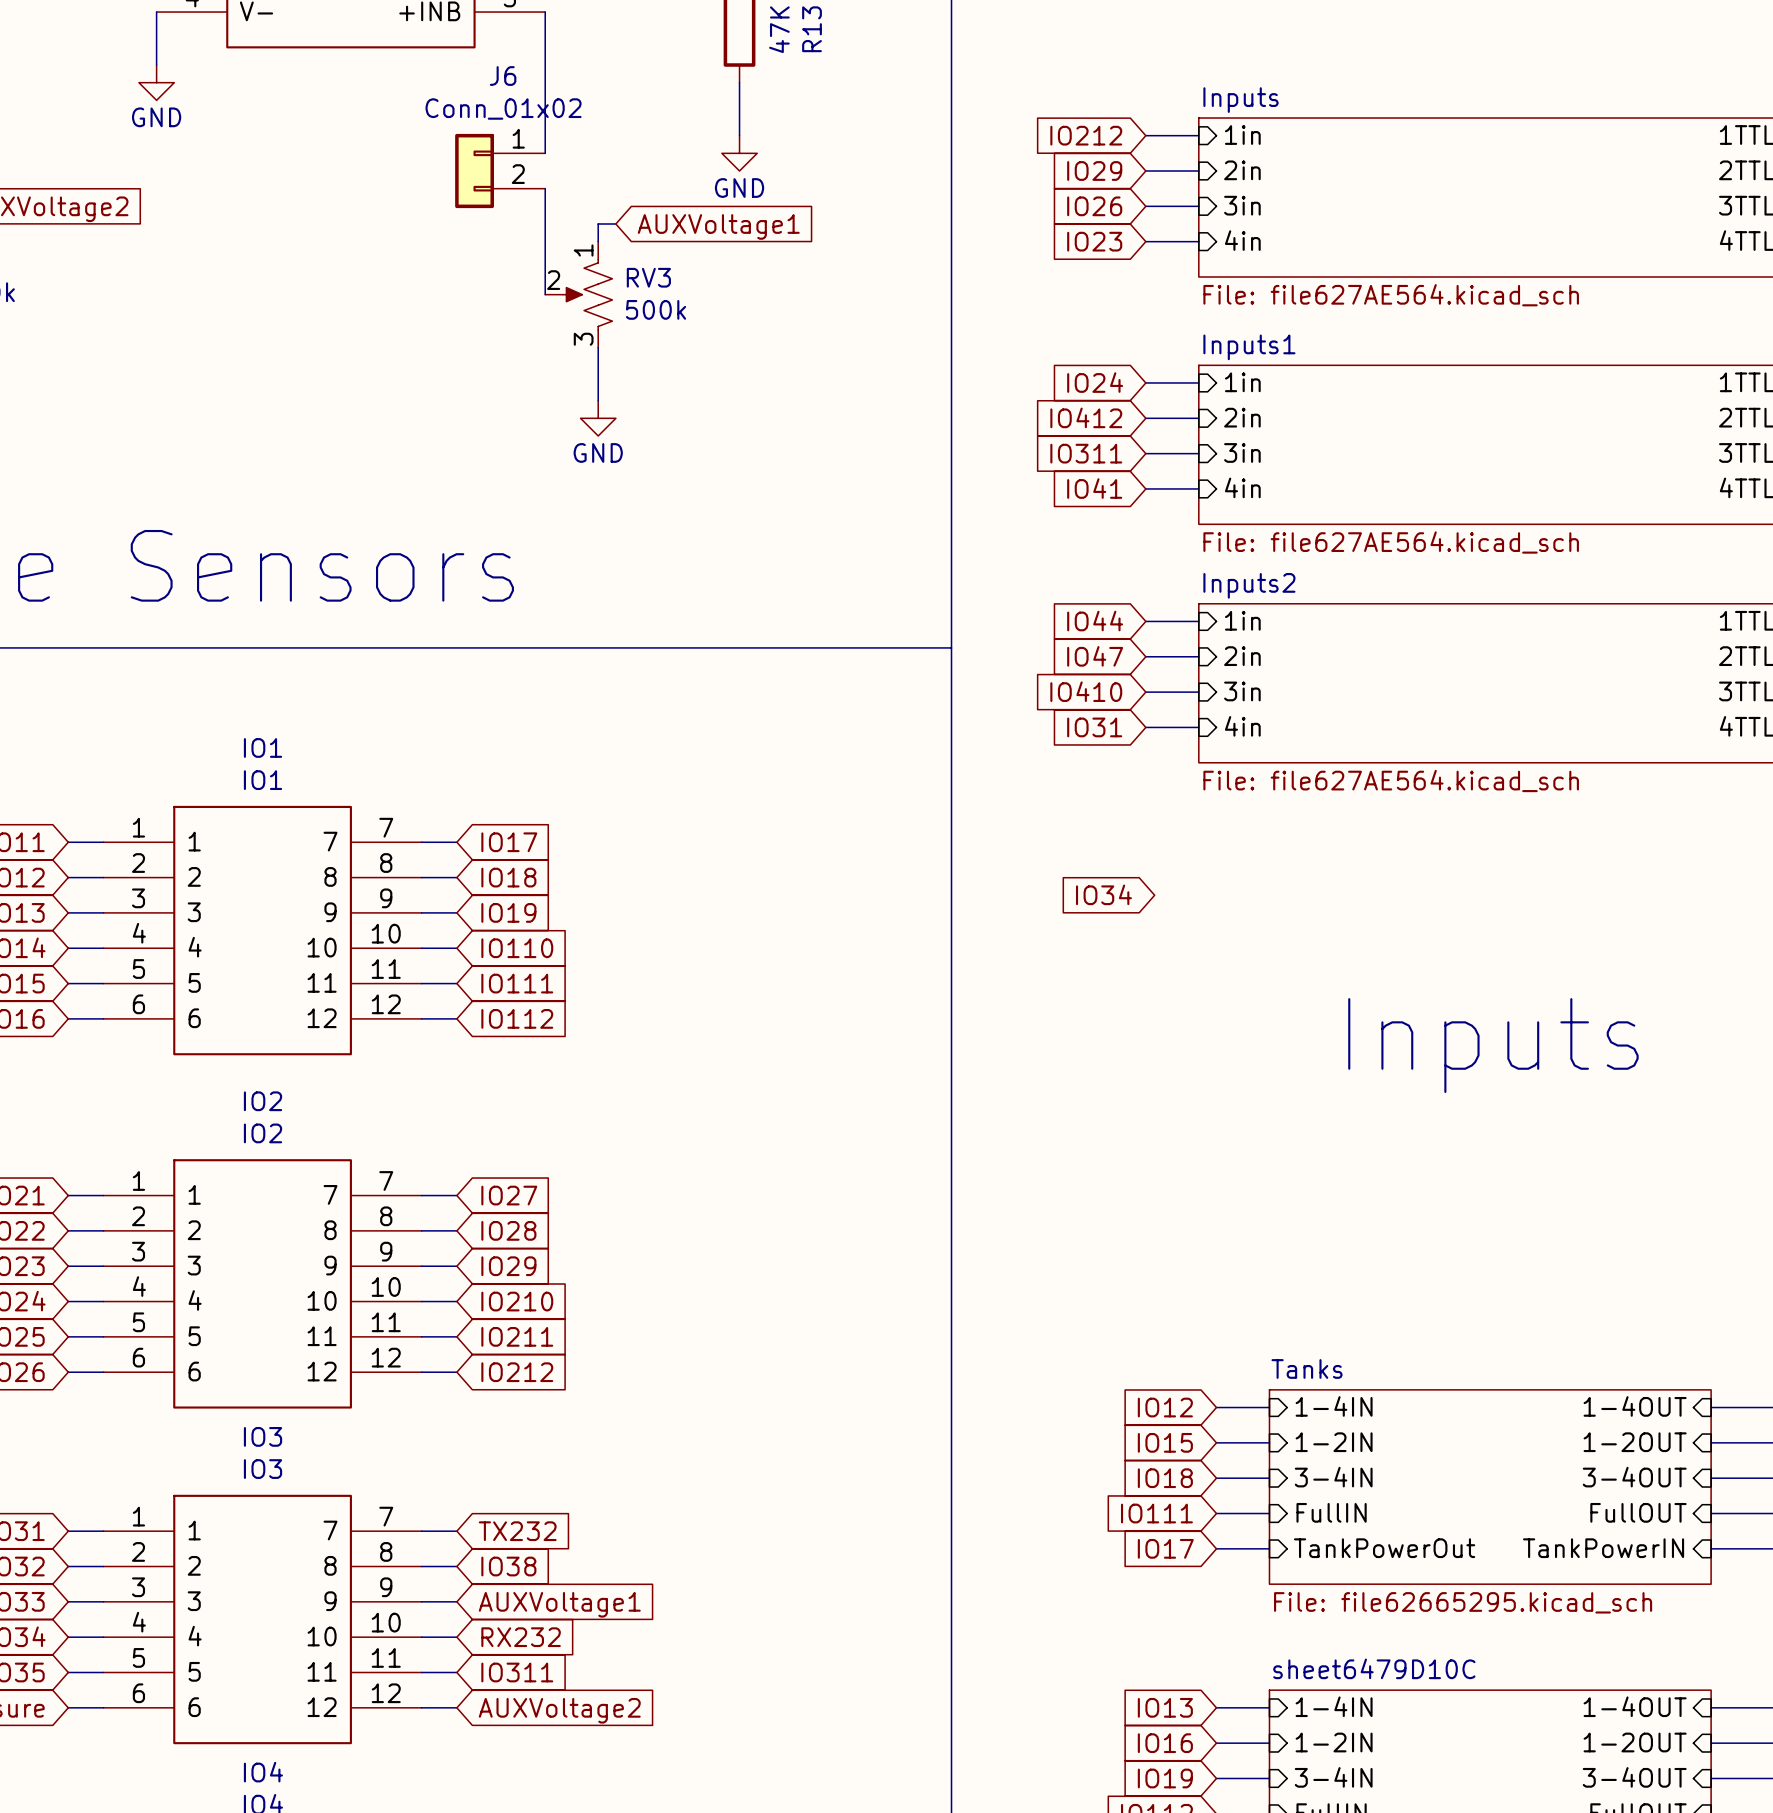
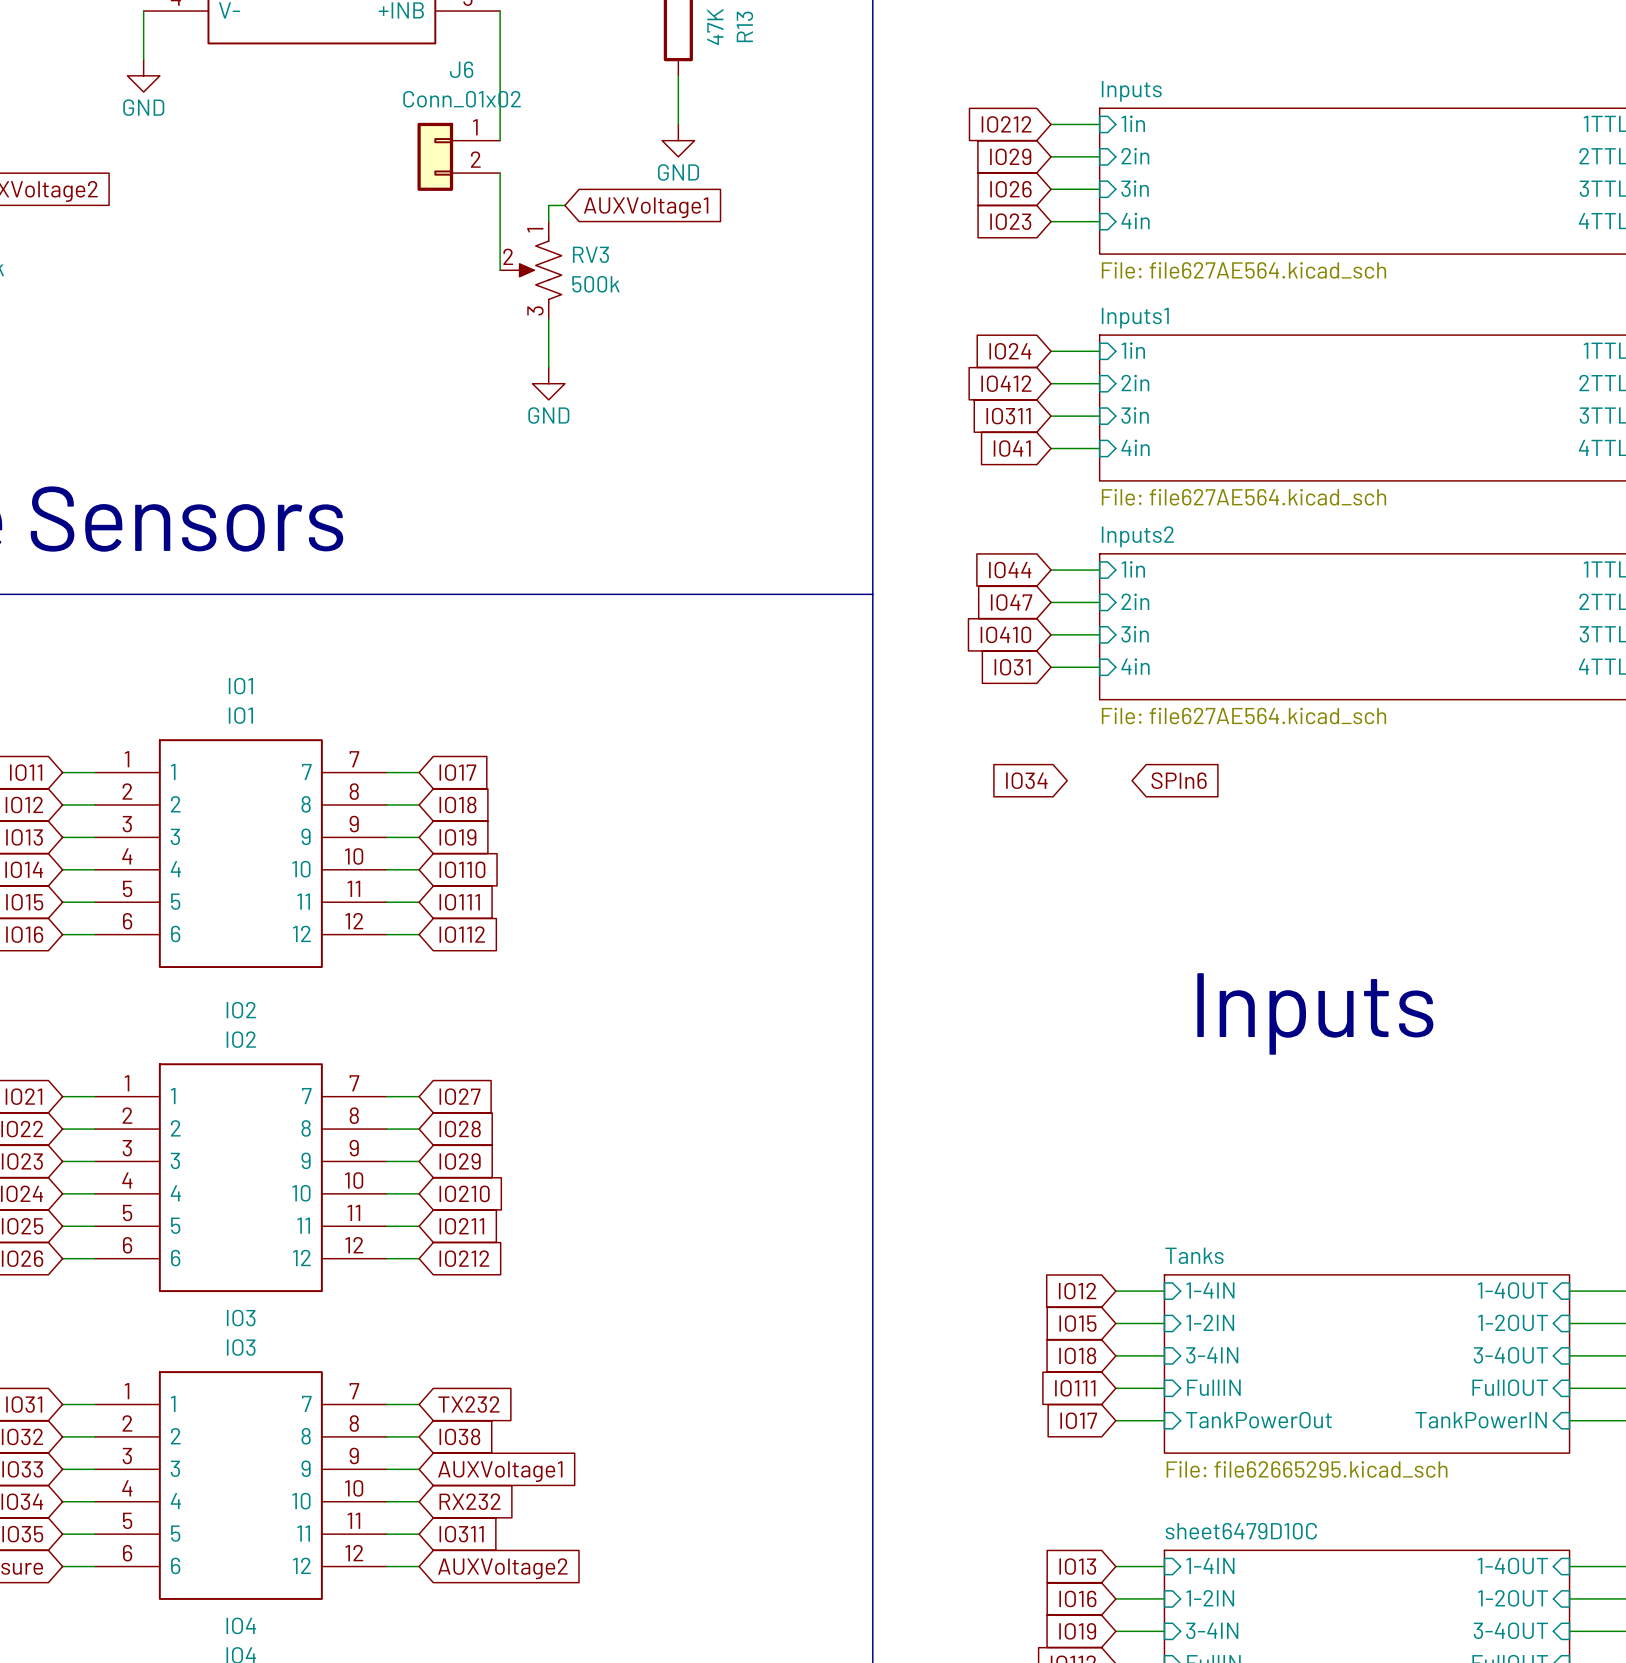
global label: none -> SPIn6 (1179, 780)
global label position: IO34 (1103, 894) -> IO34 (1026, 780)
text position: Inputs (1493, 1045) -> Inputs (1315, 1013)

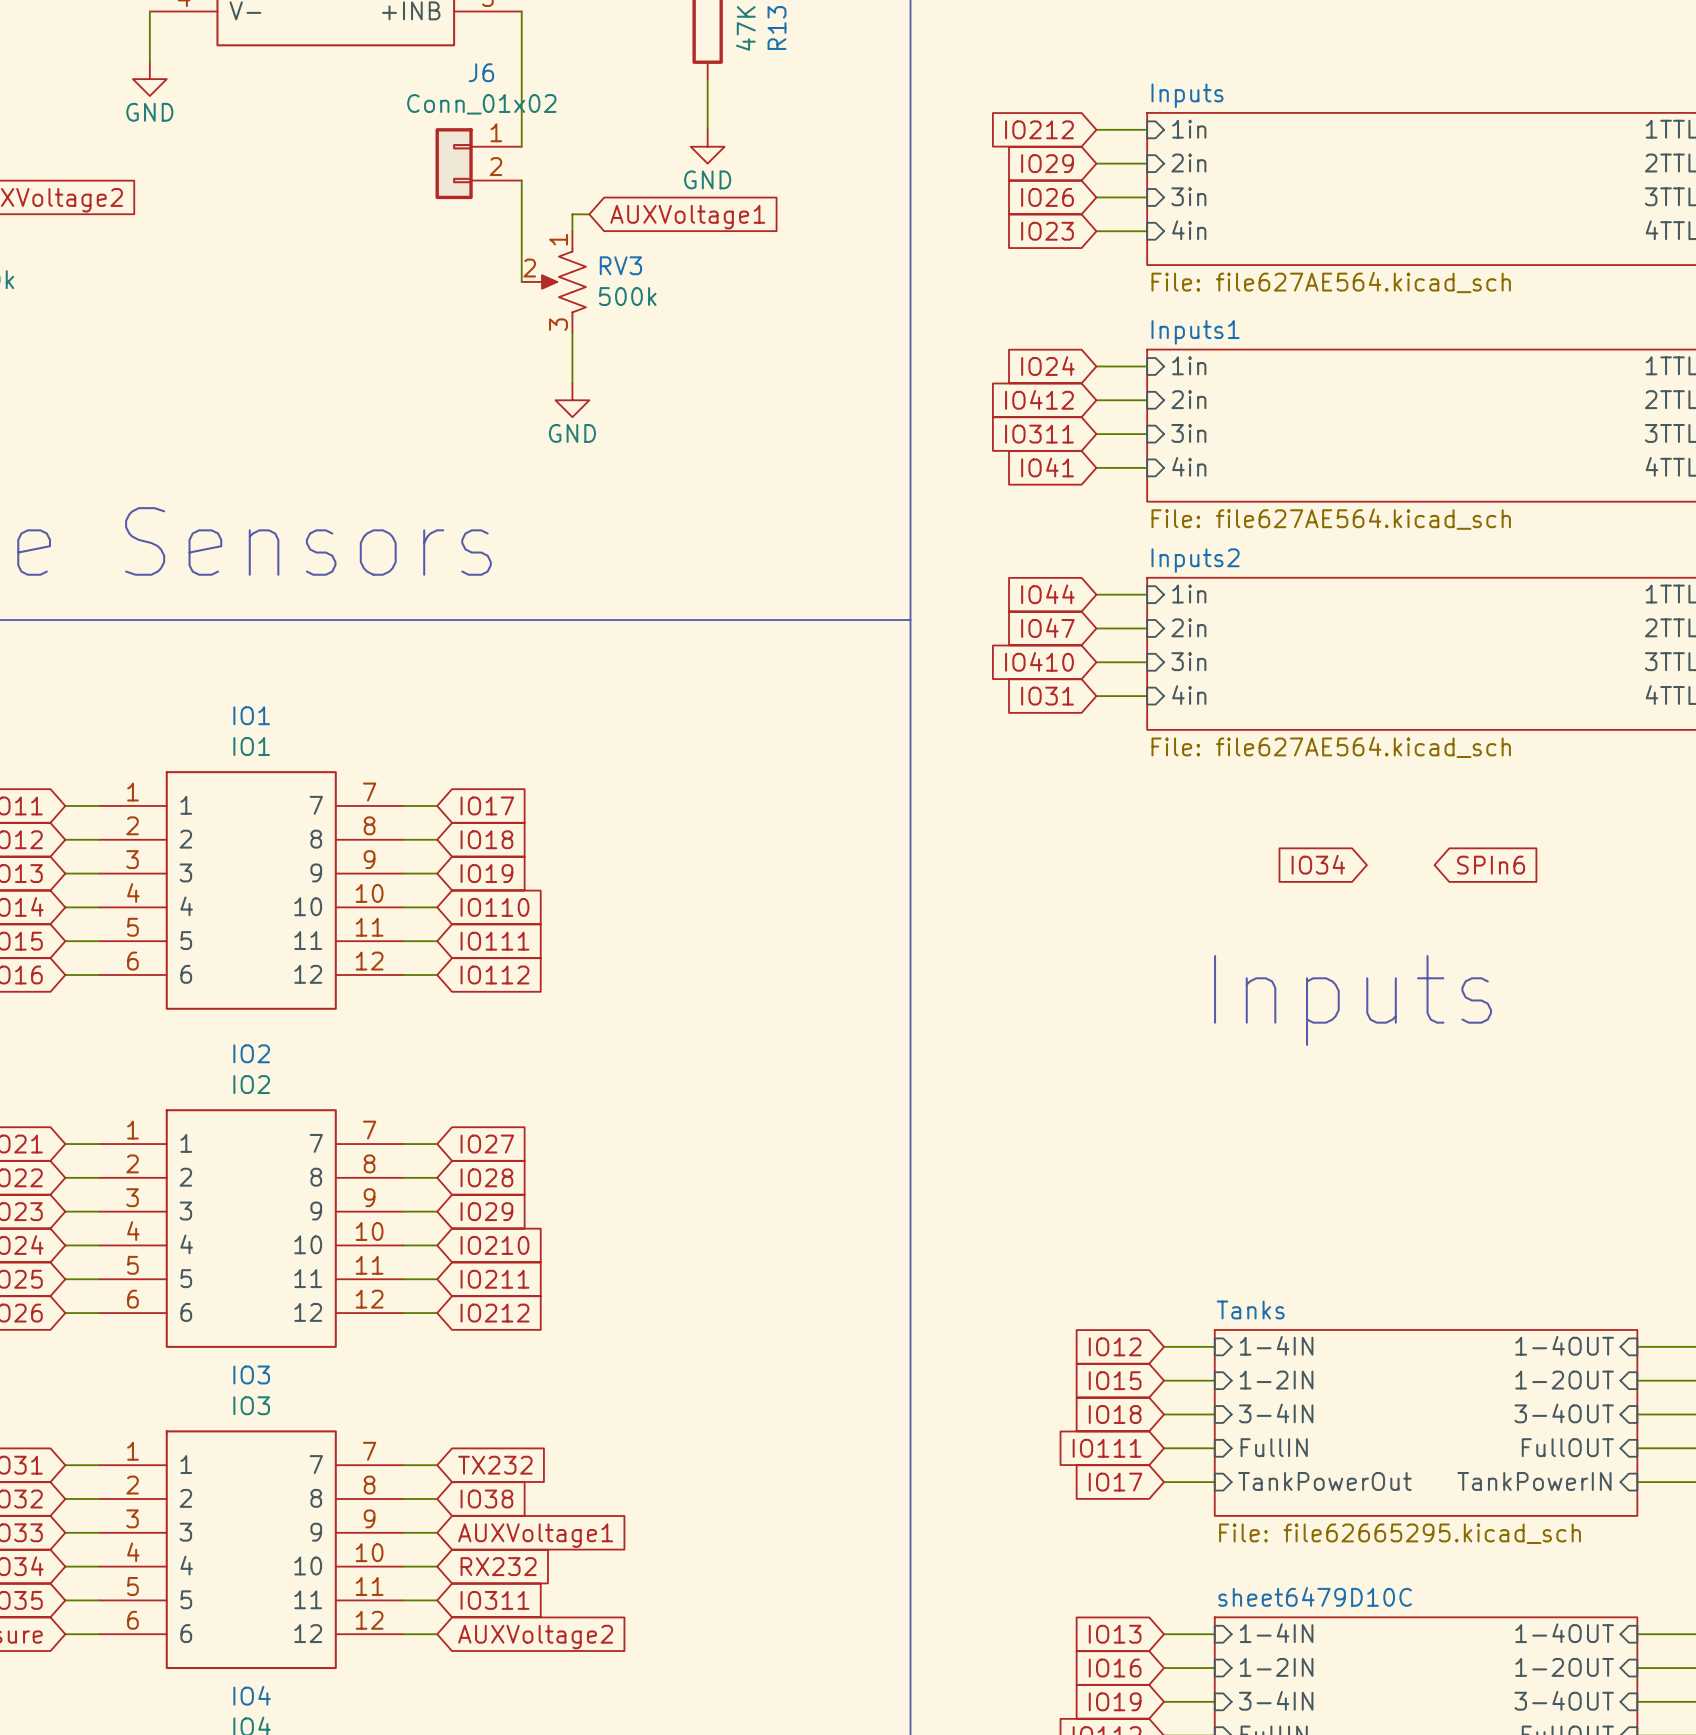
global label position: IO34 (1026, 780) -> IO34 (1318, 864)
global label position: SPIn6 (1179, 780) -> SPIn6 (1491, 865)
text position: Inputs (1315, 1013) -> Inputs (1353, 1000)

